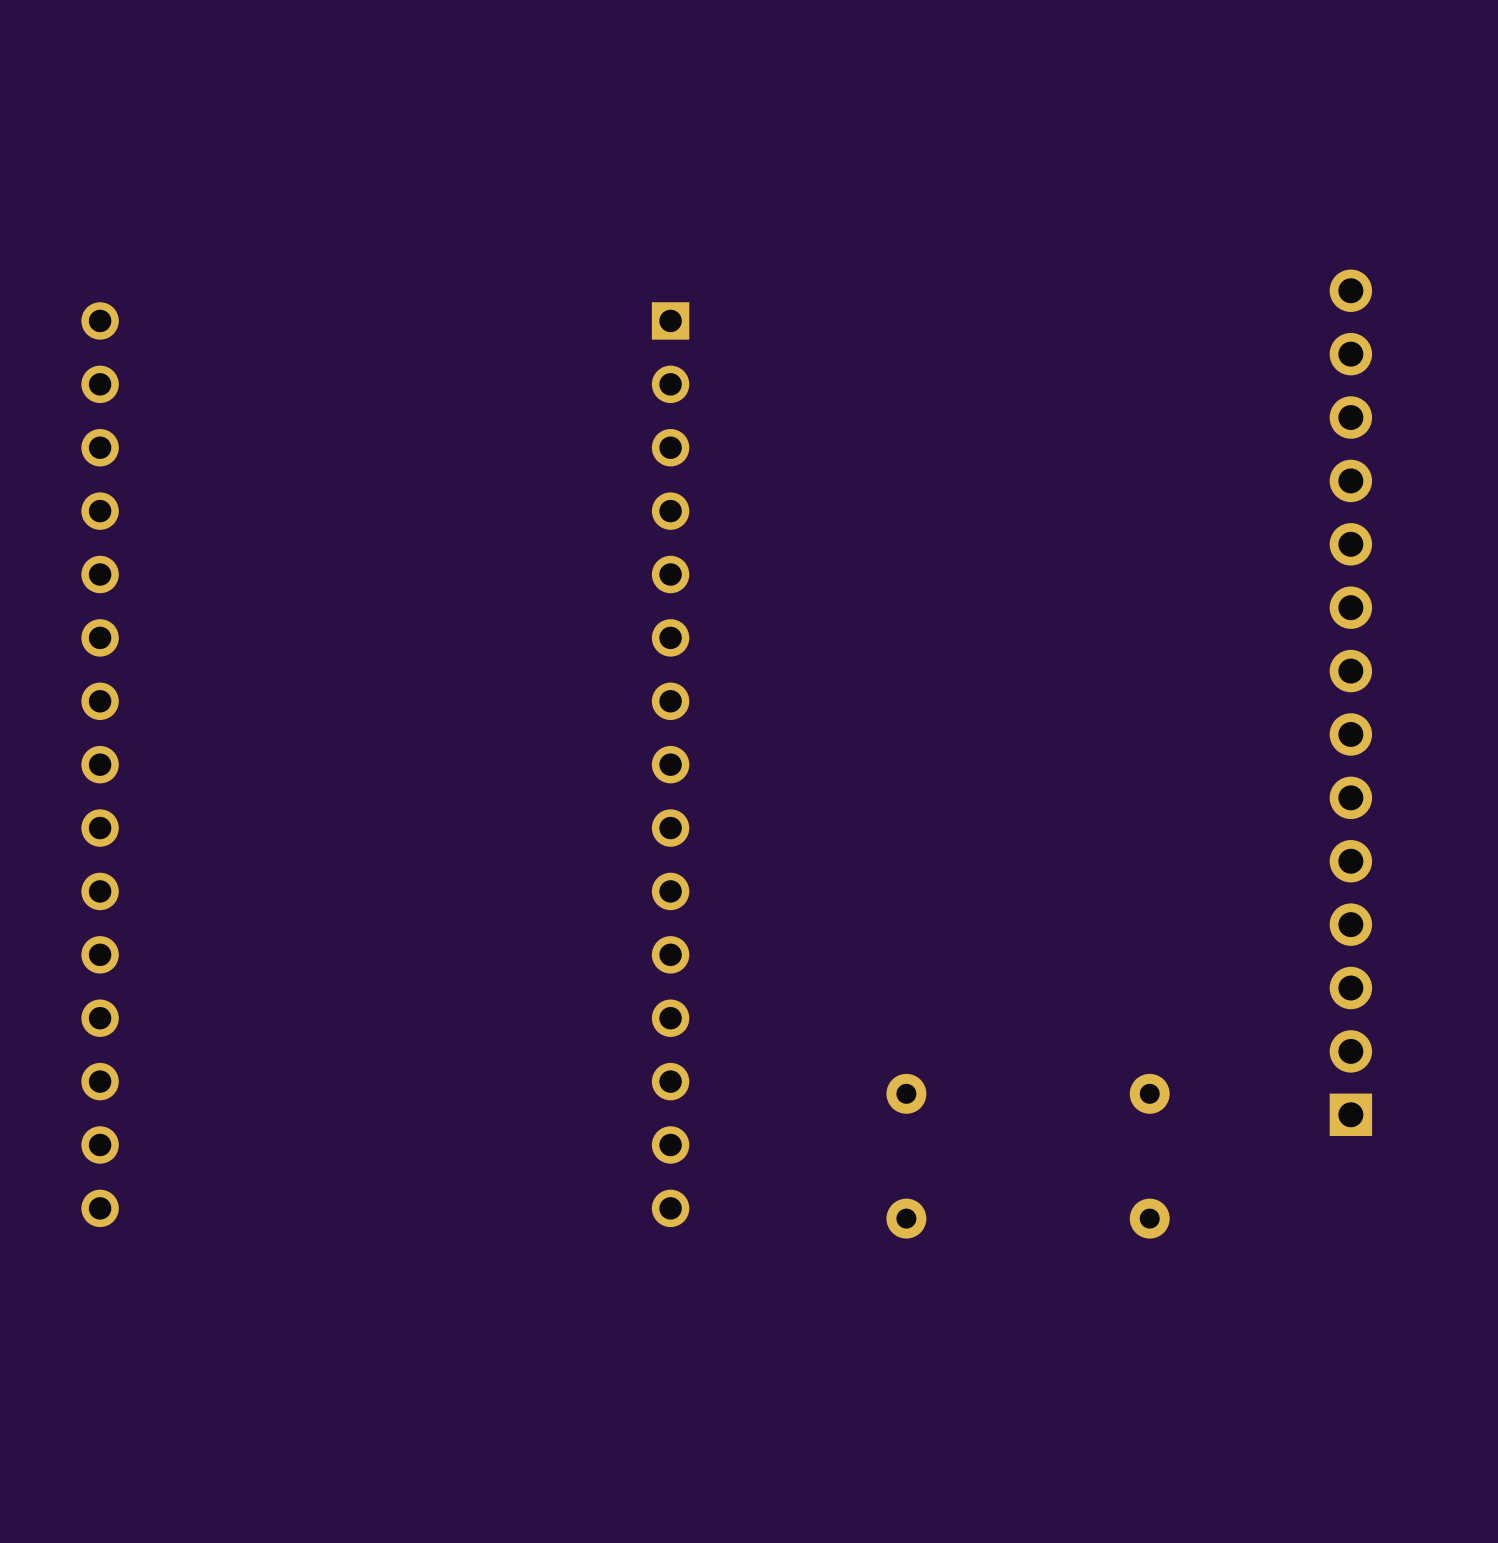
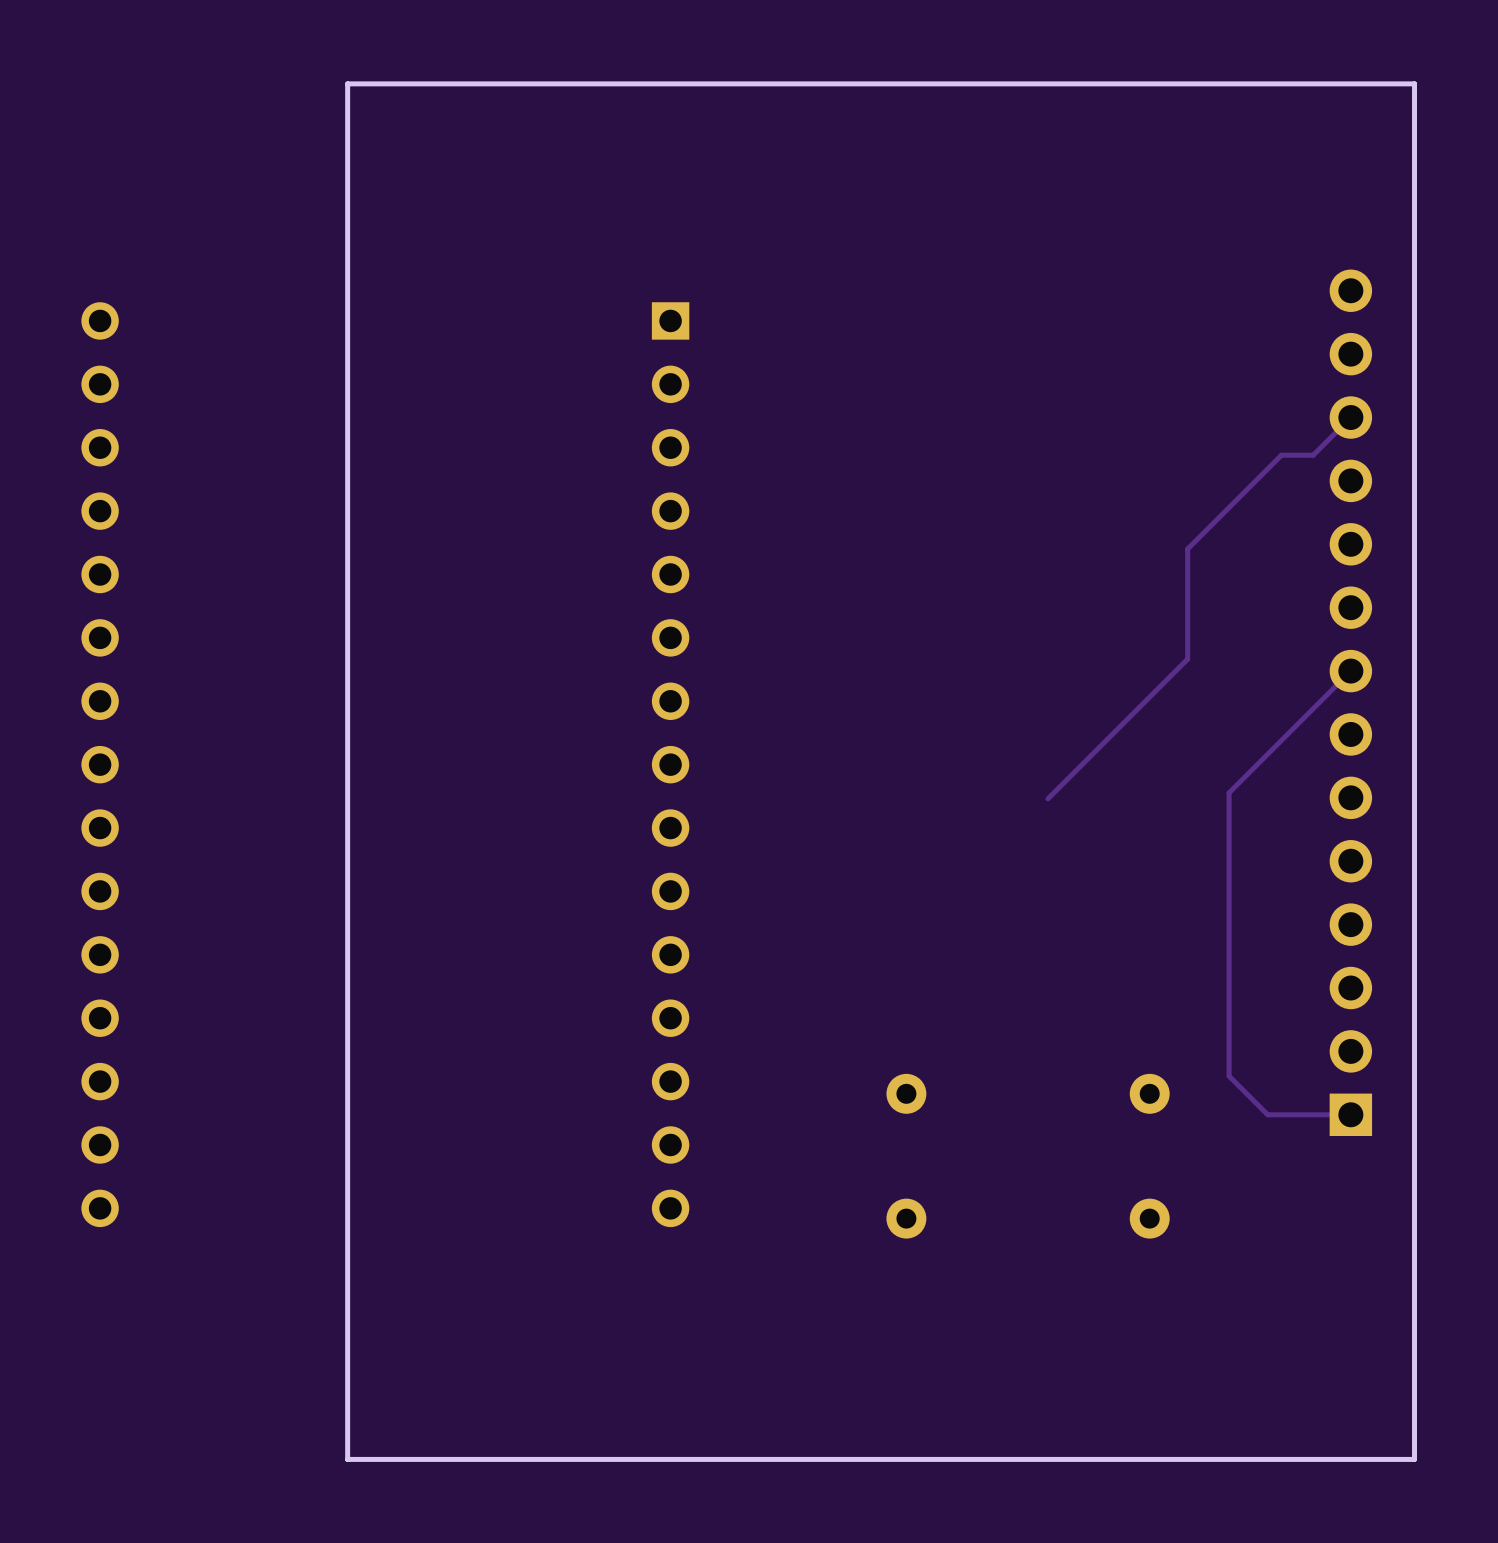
board edge: none -> (1414, 83) (347, 83) (347, 1459) (1414, 1459) (1414, 83)
track: none -> (1350, 417) (1313, 455) (1281, 455) (1187, 549) (1187, 659) (1047, 798)
track: none -> (1350, 671) (1229, 792) (1229, 1076) (1267, 1114) (1350, 1114)

